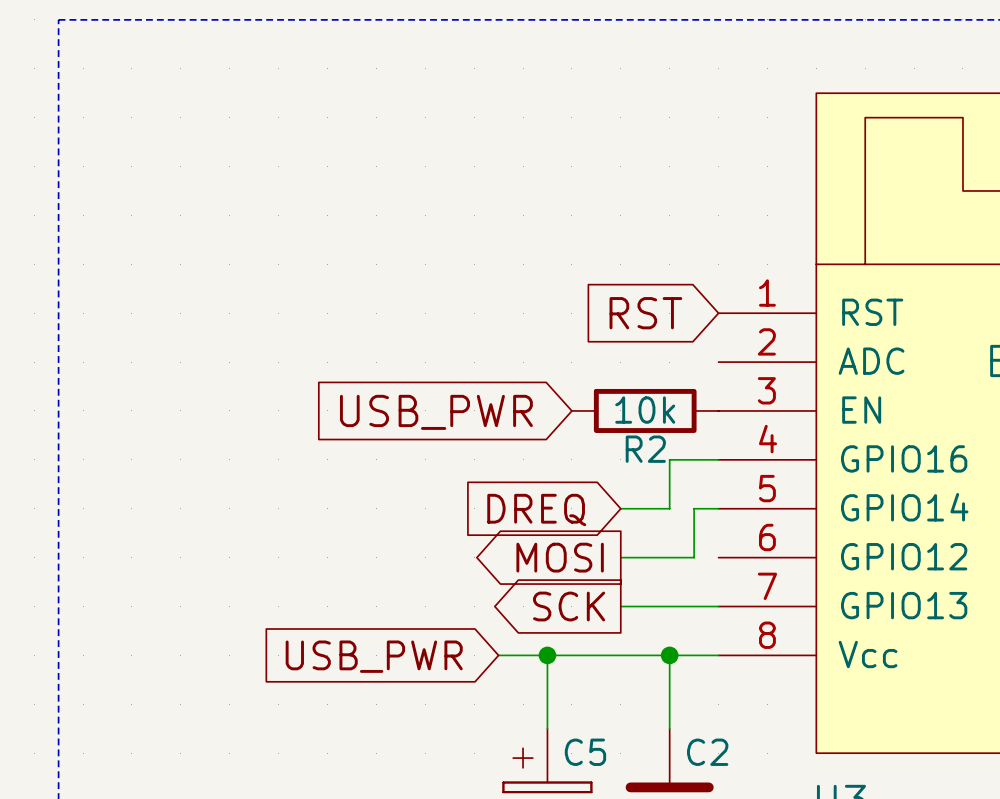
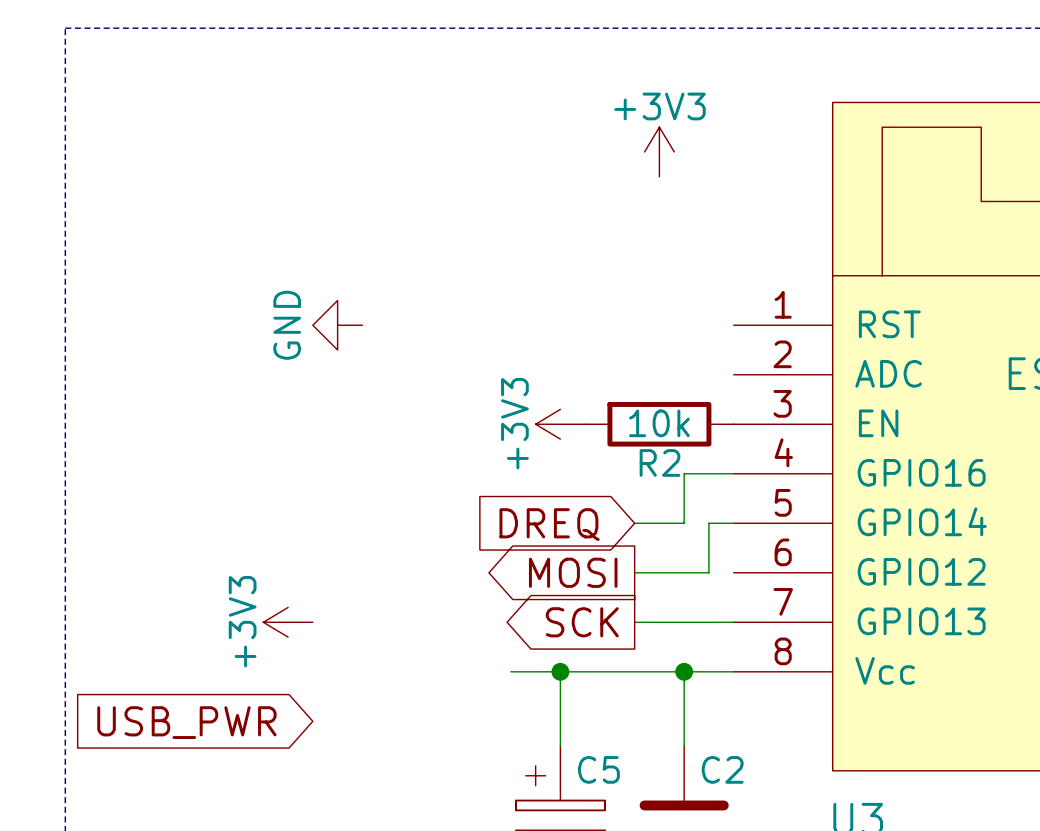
power symbol: none -> +3V3 (659, 151)
power symbol: none -> GND (337, 325)
global label: RST (645, 313) -> none
power symbol: none -> +3V3 (560, 424)
global label: USB_PWR (436, 412) -> none
power symbol: none -> +3V3 (288, 622)
global label position: USB_PWR (374, 656) -> USB_PWR (186, 722)

